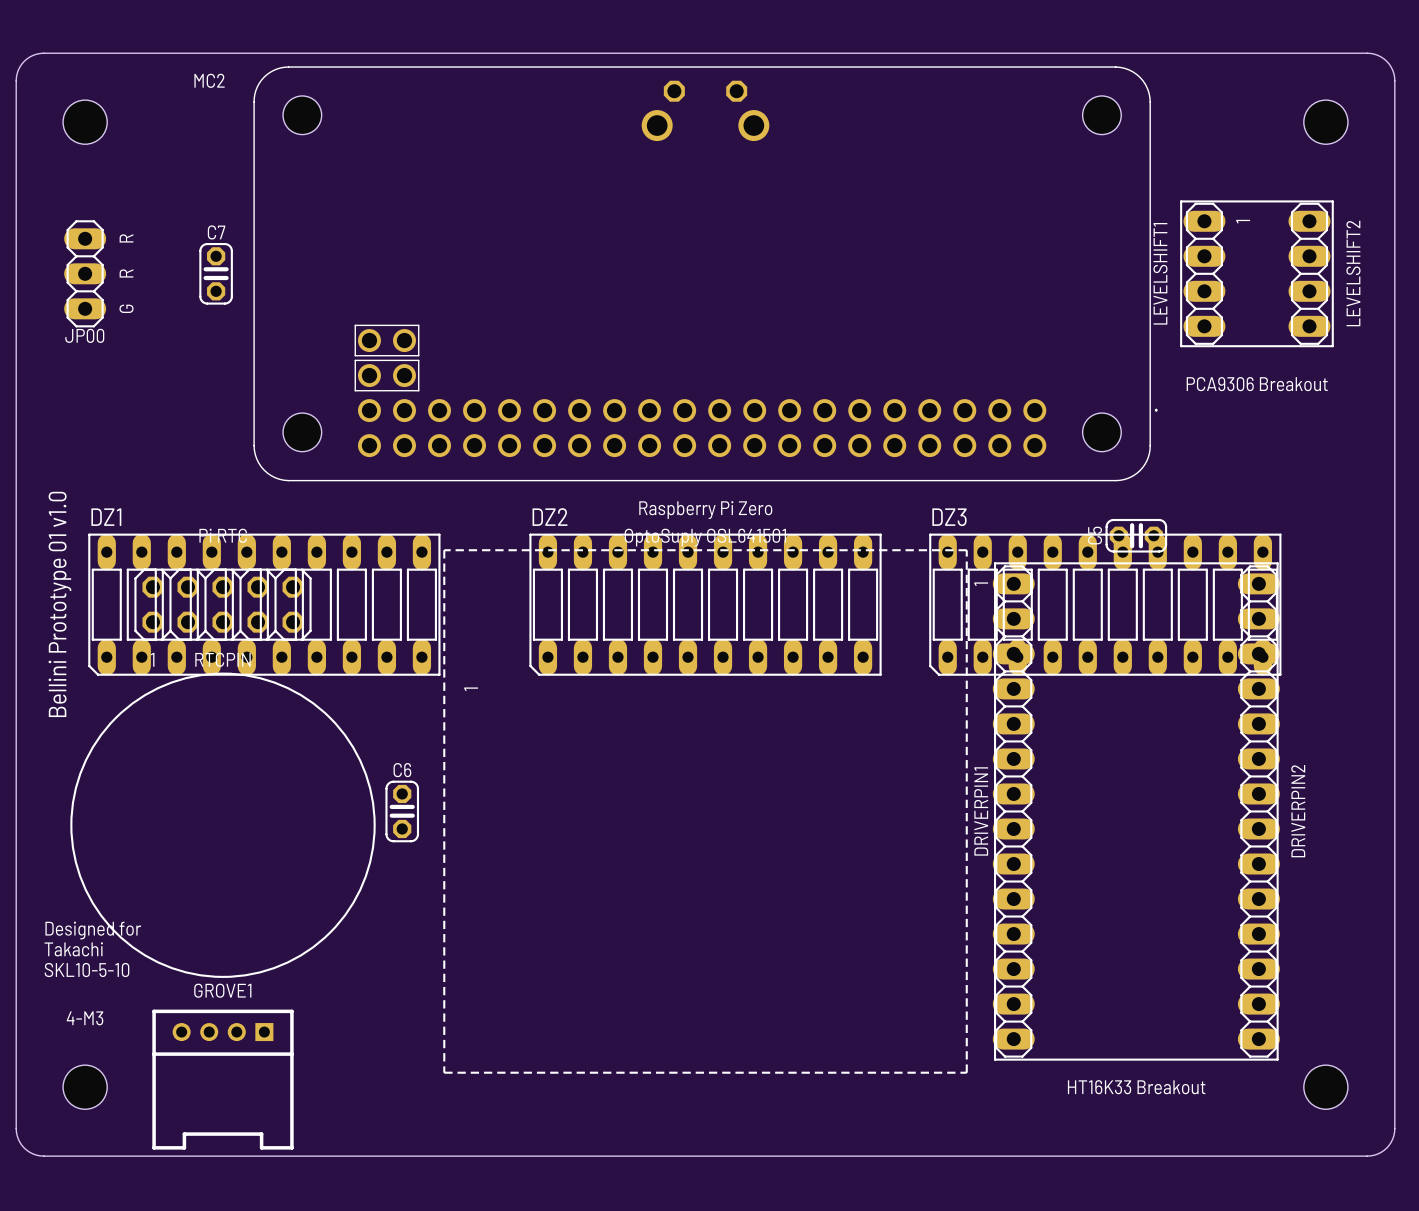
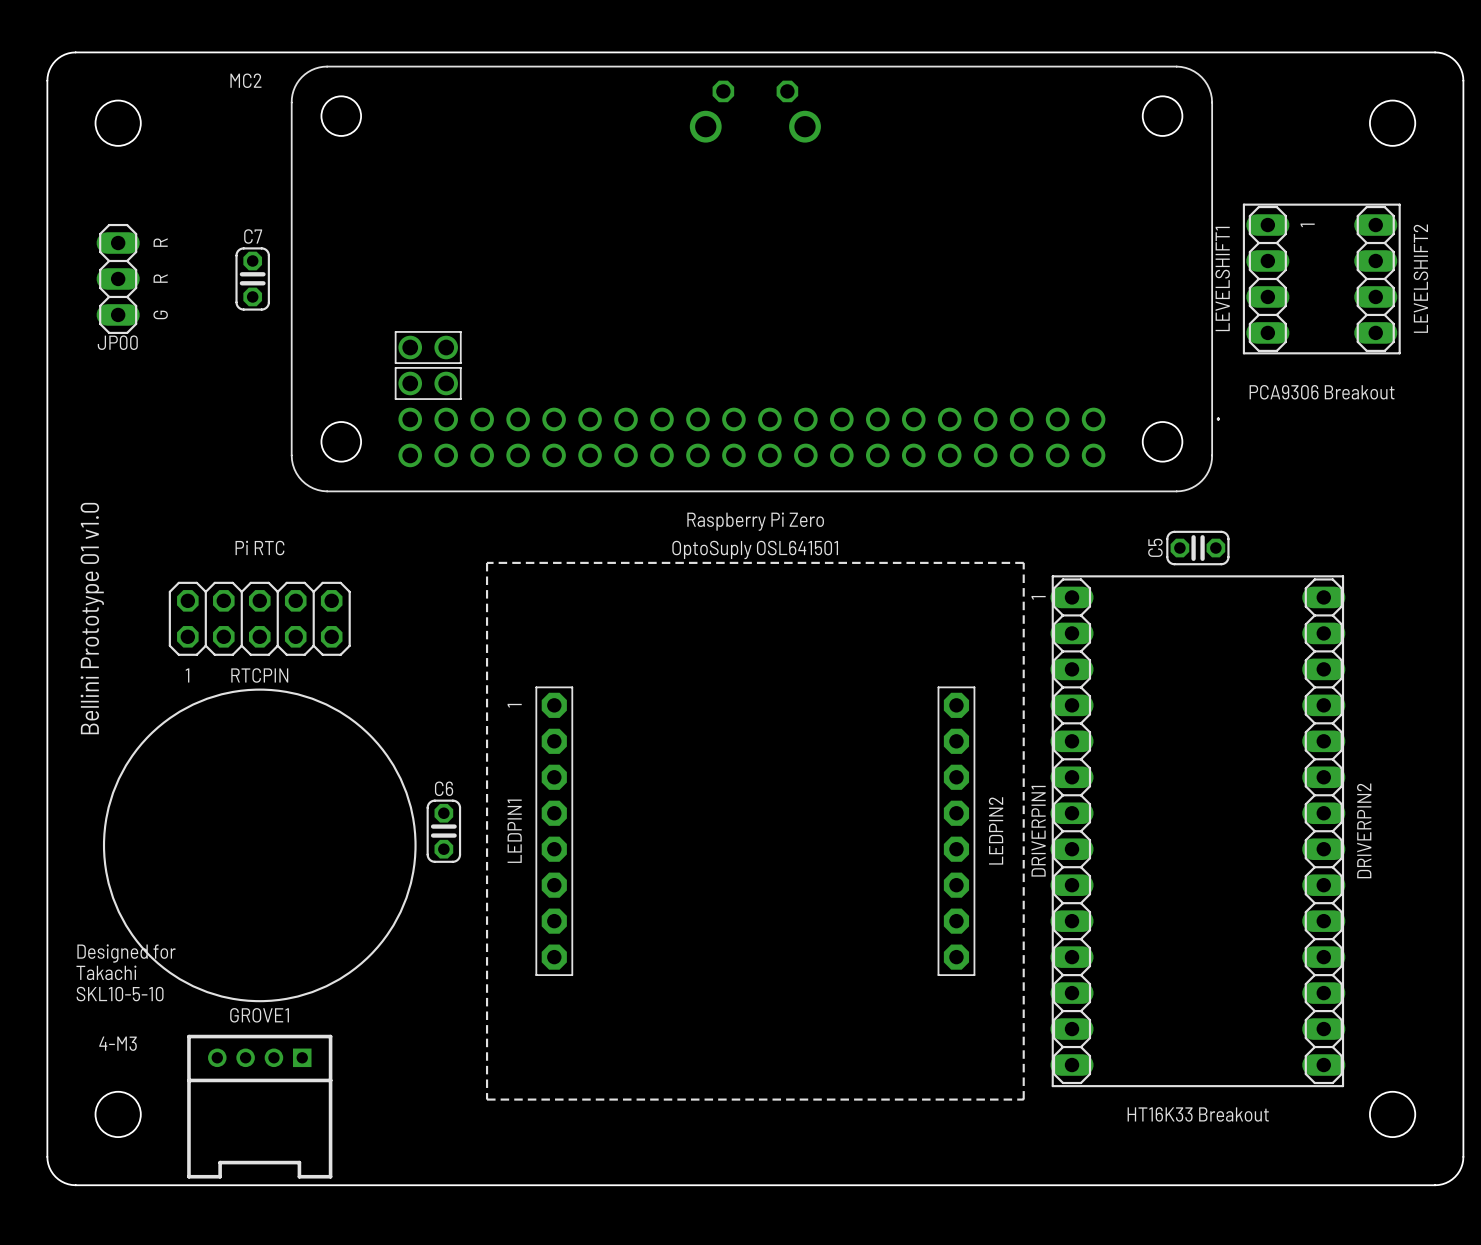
DZ1: (264, 604) -> none
DZ2: (705, 604) -> none
DZ3: (1105, 604) -> none
LEDPIN1: none -> (554, 831)
LEDPIN2: none -> (956, 831)

